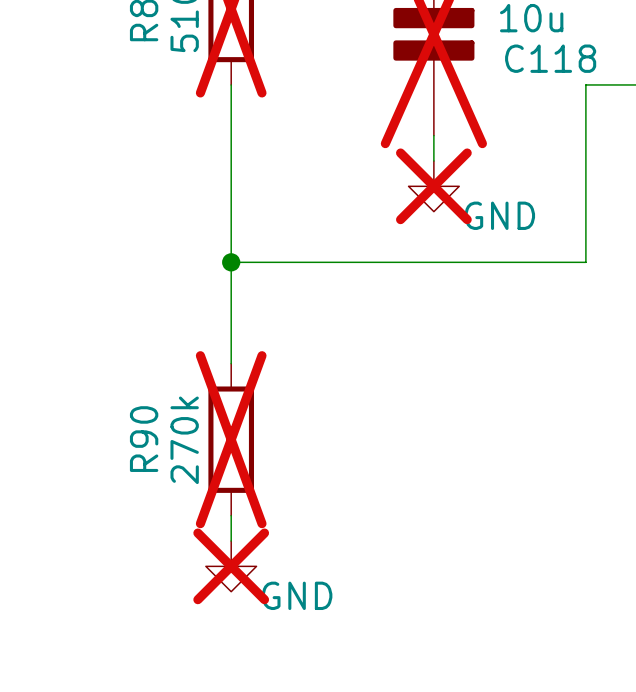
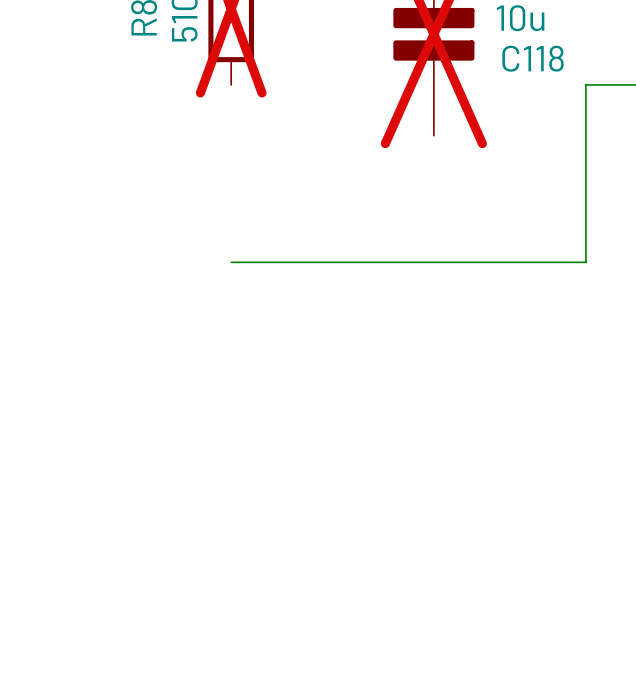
wire: (231, 84) (231, 363) -> none
wire: (433, 135) (433, 160) -> none
power symbol: GND (433, 186) -> none
junction: (231, 262) -> none
R90: 270k (231, 439) -> none
wire: (231, 515) (231, 541) -> none
power symbol: GND (231, 566) -> none

